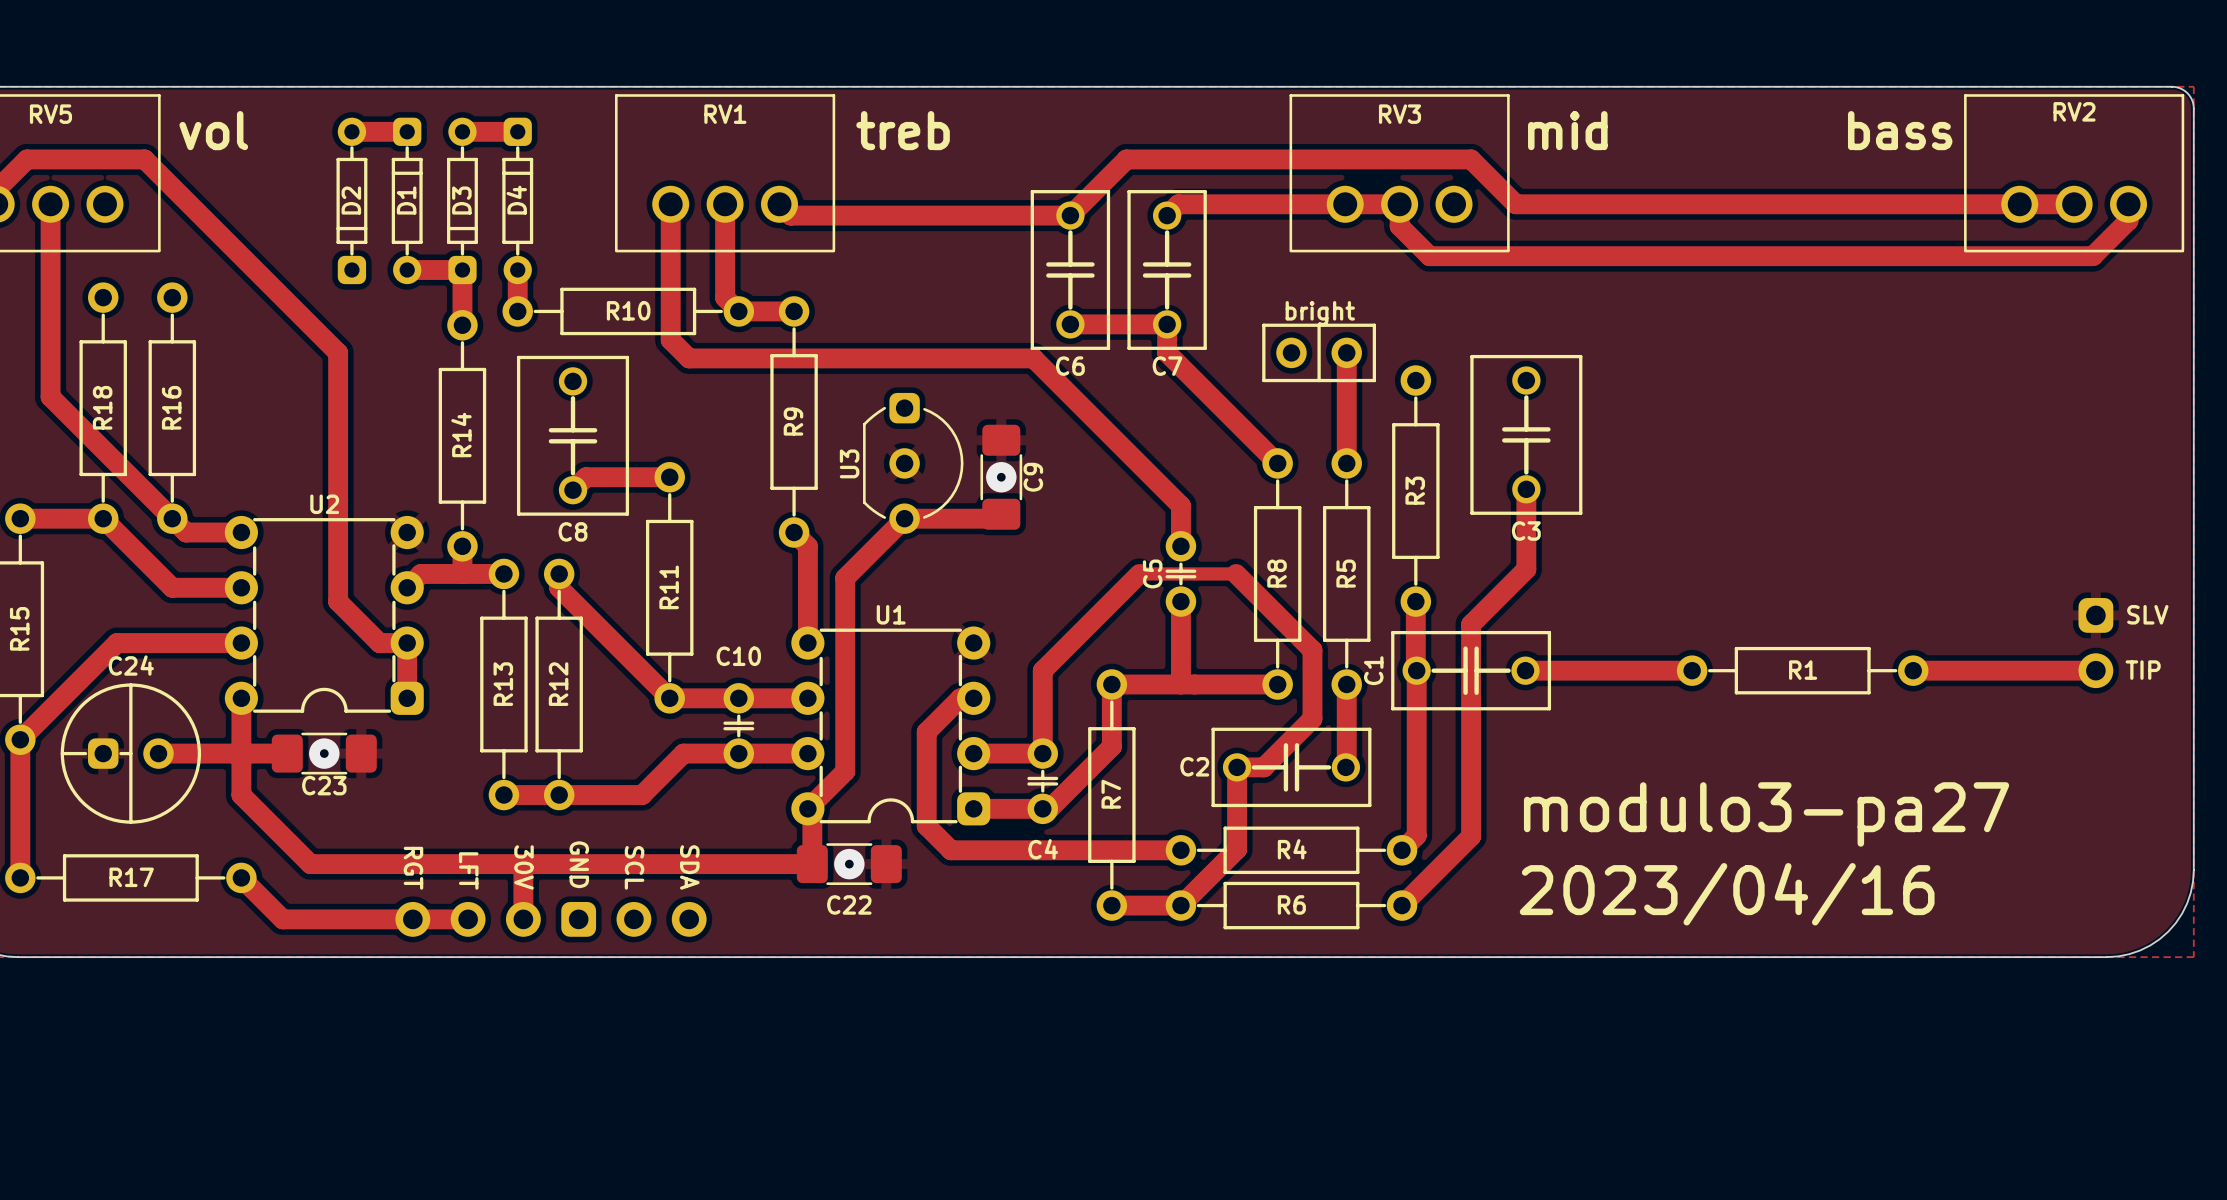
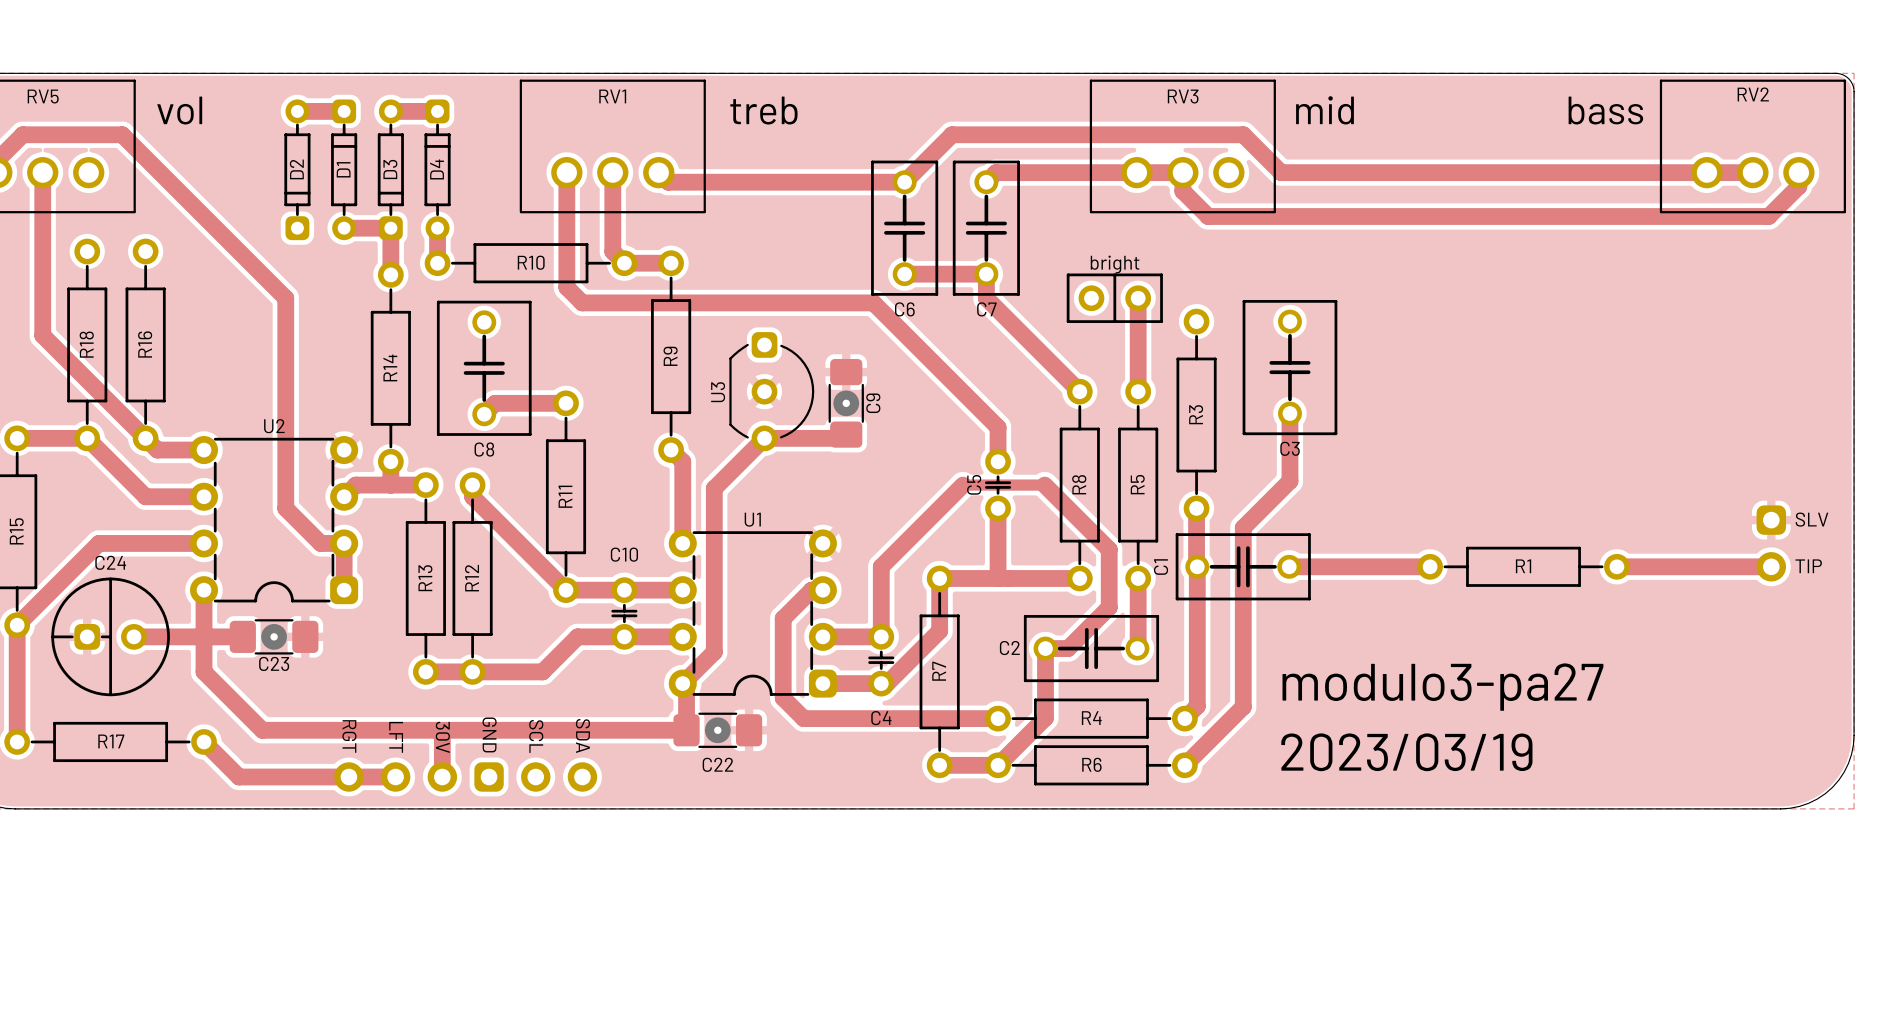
text: 2023/04/16 (1727, 894) -> 2023/03/19 (1406, 752)

